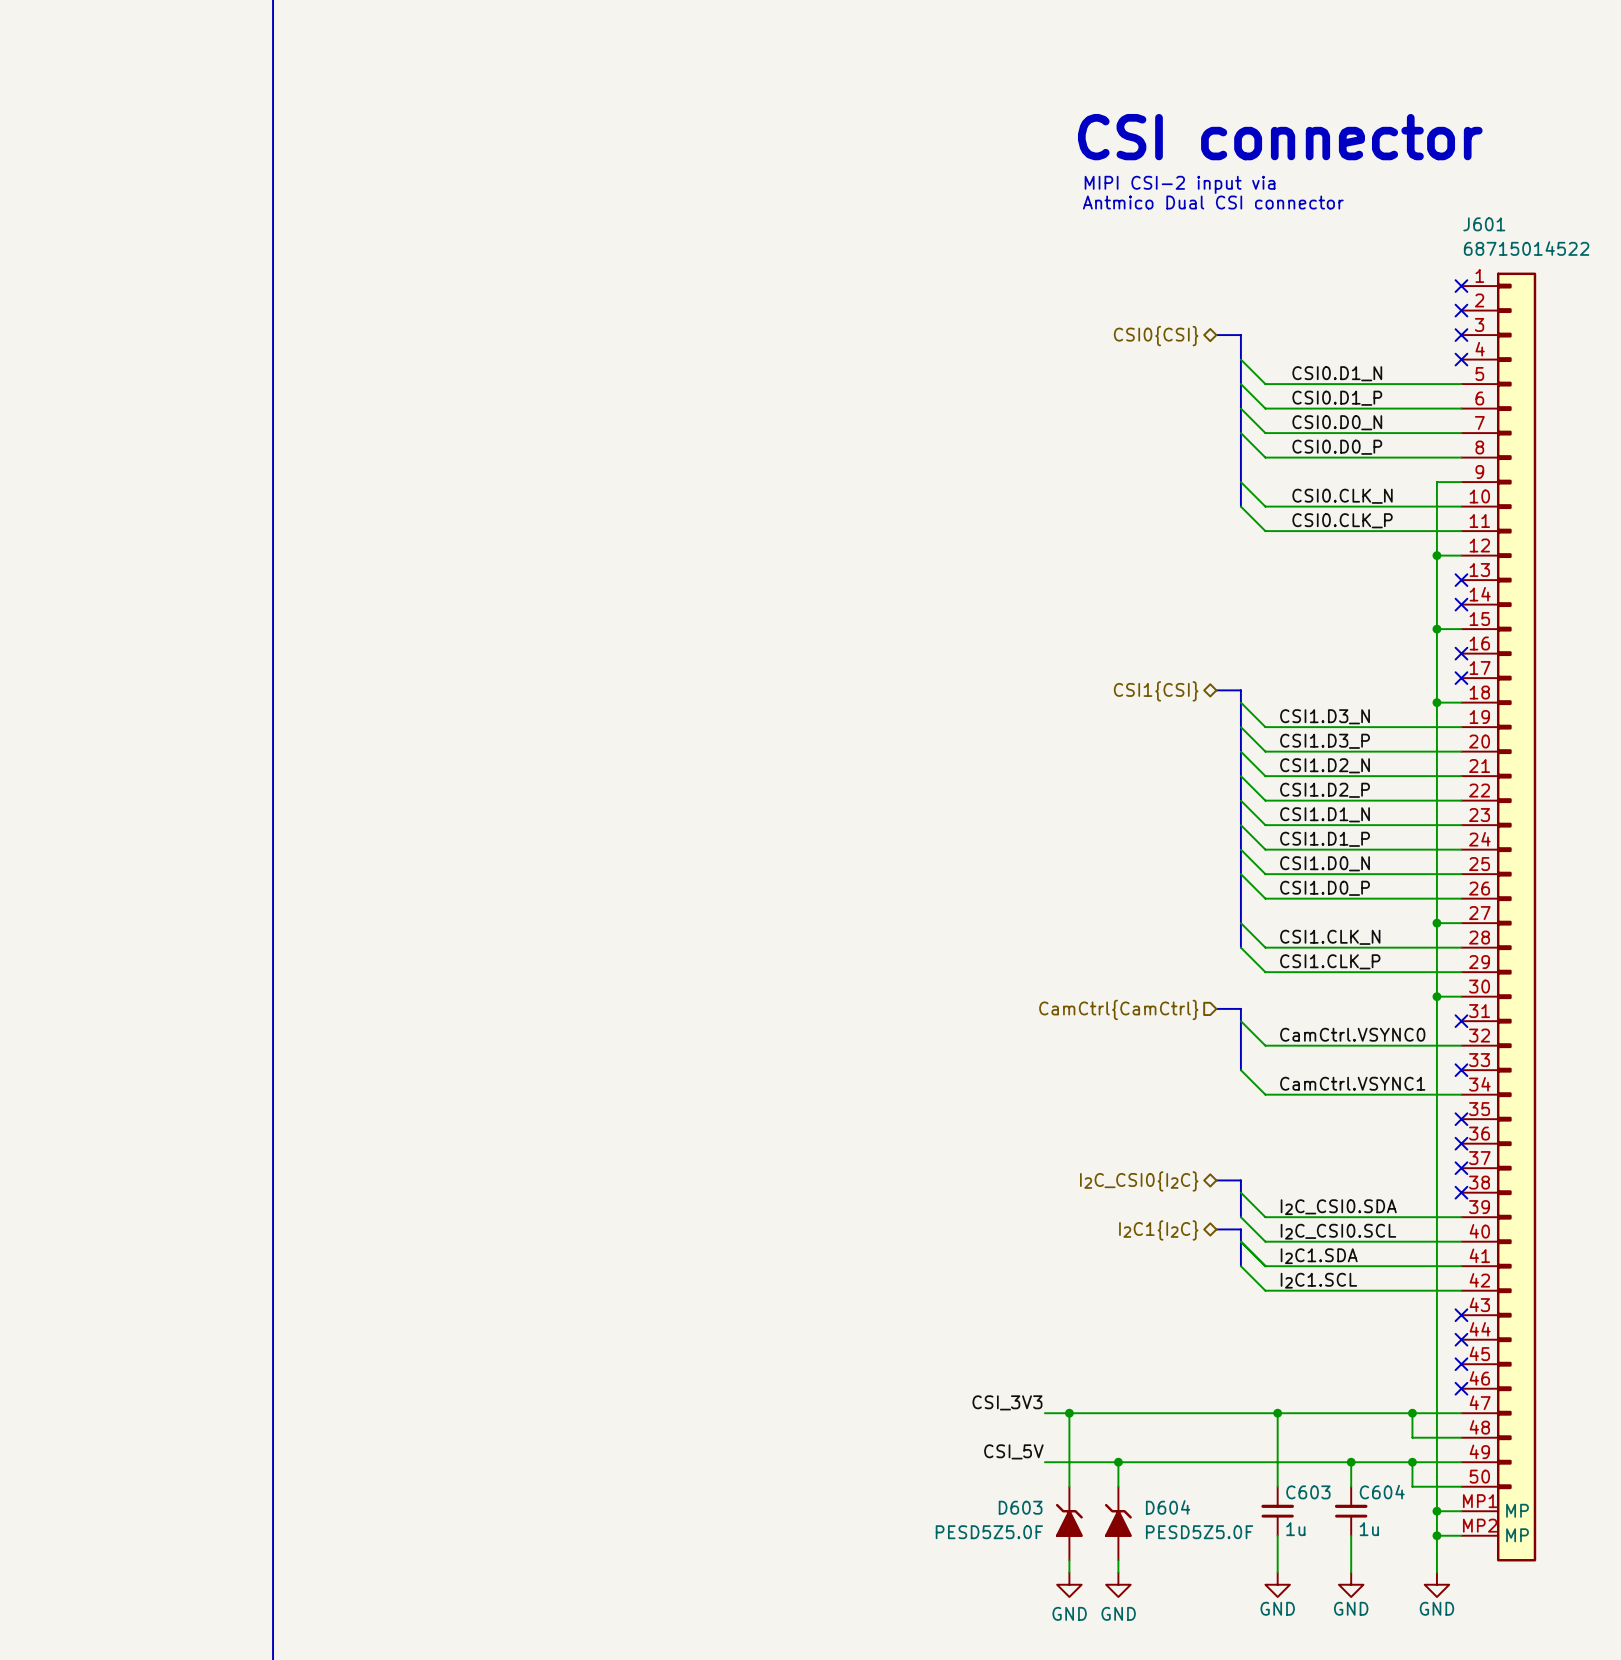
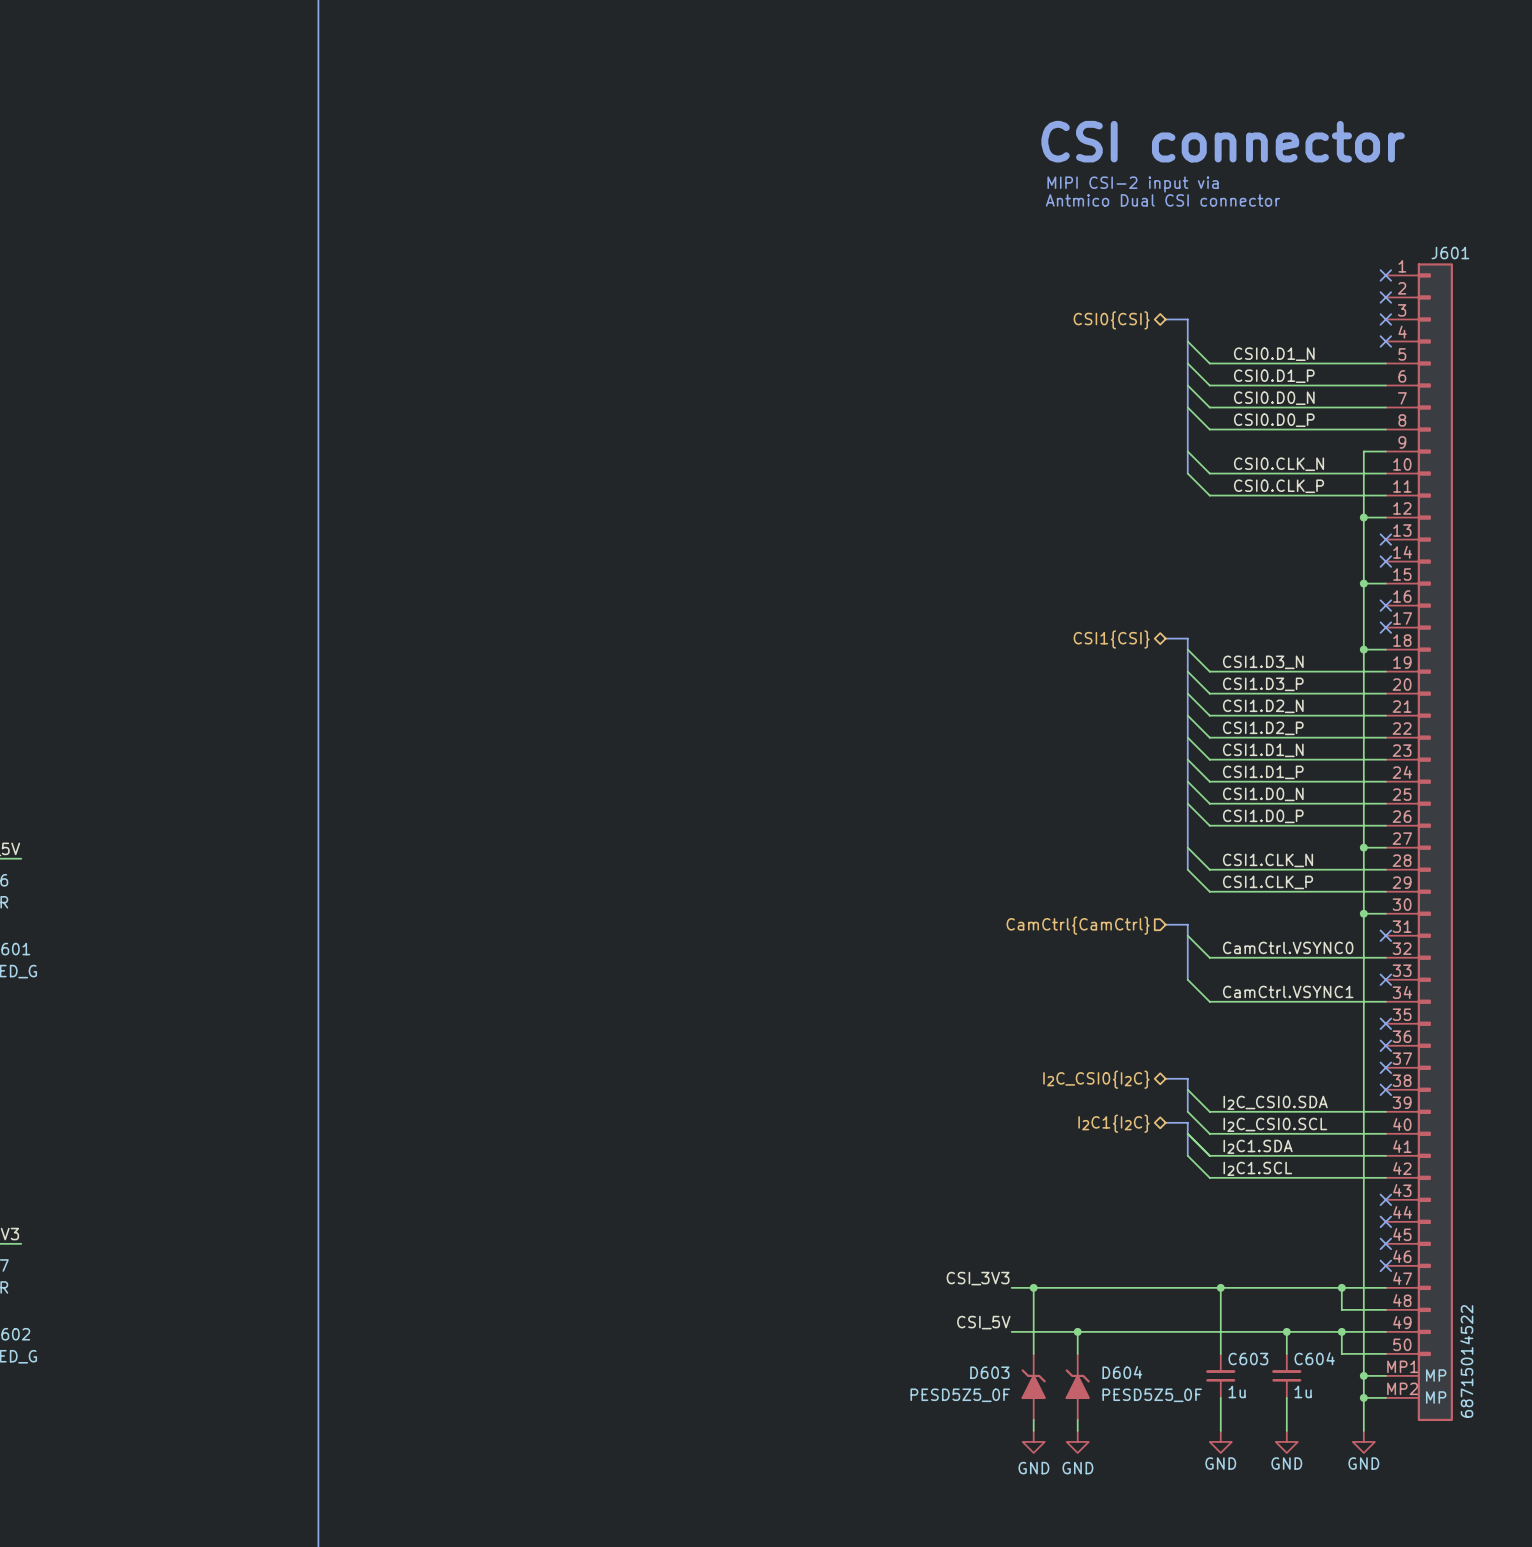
J601 name position: J601 (1484, 224) -> J601 (1450, 253)
J601 text rotation: 0° (1526, 248) -> 90° counterclockwise (1466, 1361)
J601 text position: 68715014522 (1526, 248) -> 68715014522 (1466, 1361)
D603 value: none -> PESD5Z5_0F (960, 1395)
D603 text: PESD5Z5.0F (989, 1532) -> none
D604 text: PESD5Z5.0F (1199, 1532) -> none
D604 value: none -> PESD5Z5_0F (1152, 1395)

